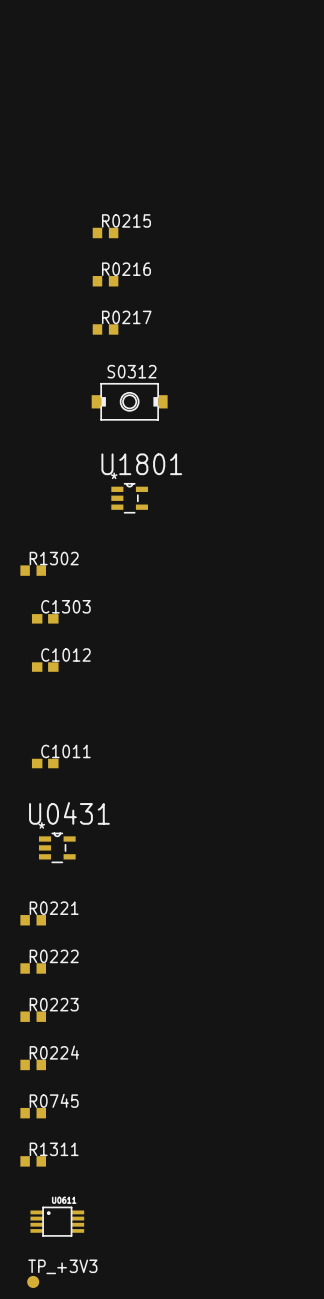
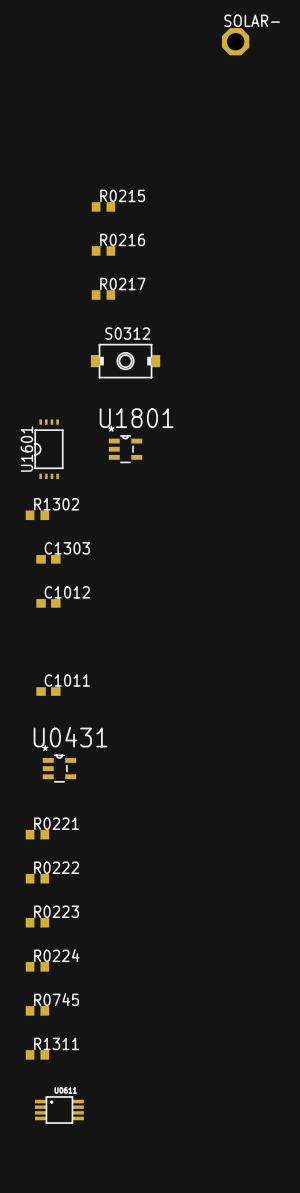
SOLAR-: none -> (235, 41)
U1601: none -> (48, 449)
TP_+3V3: (33, 1281) -> none

